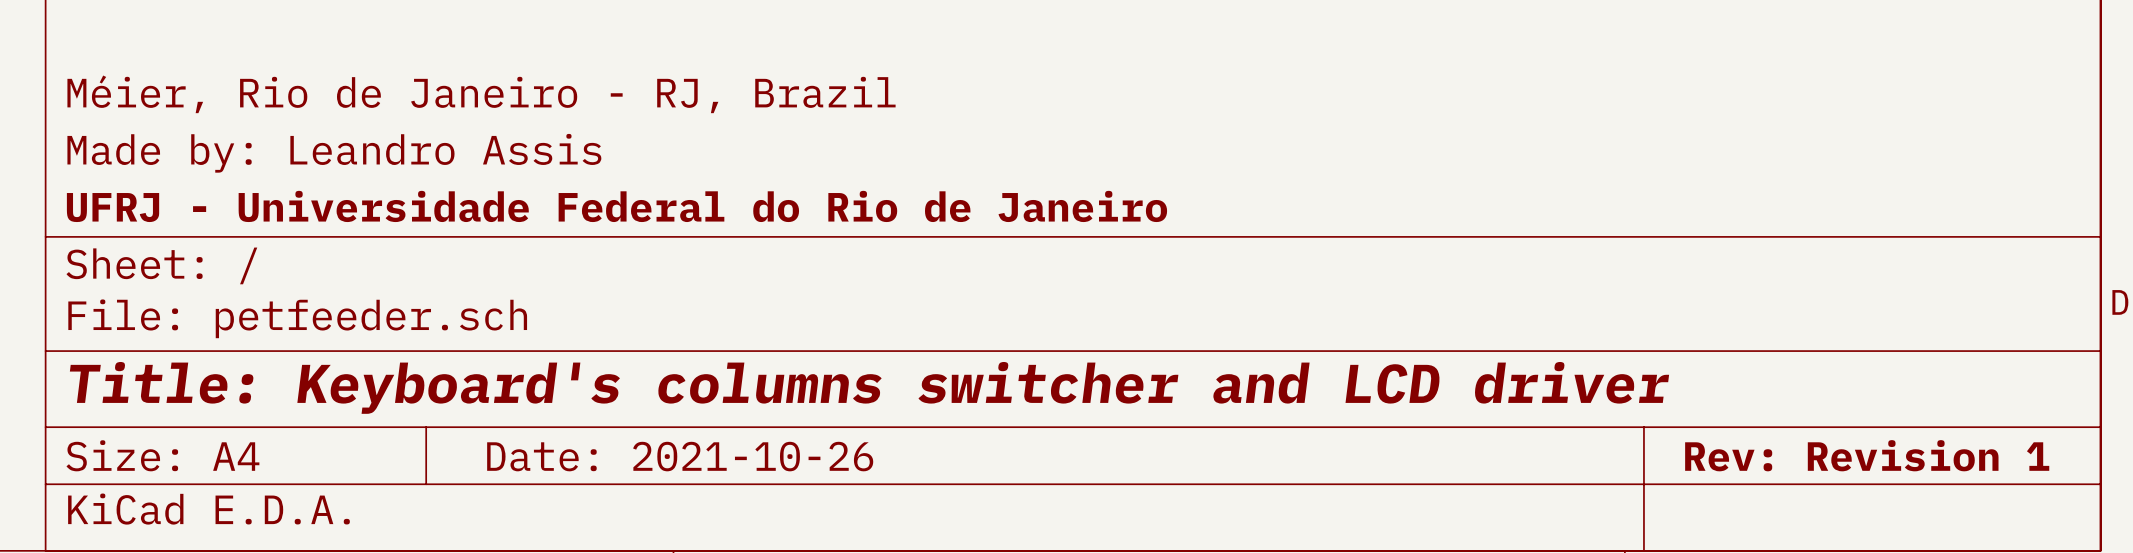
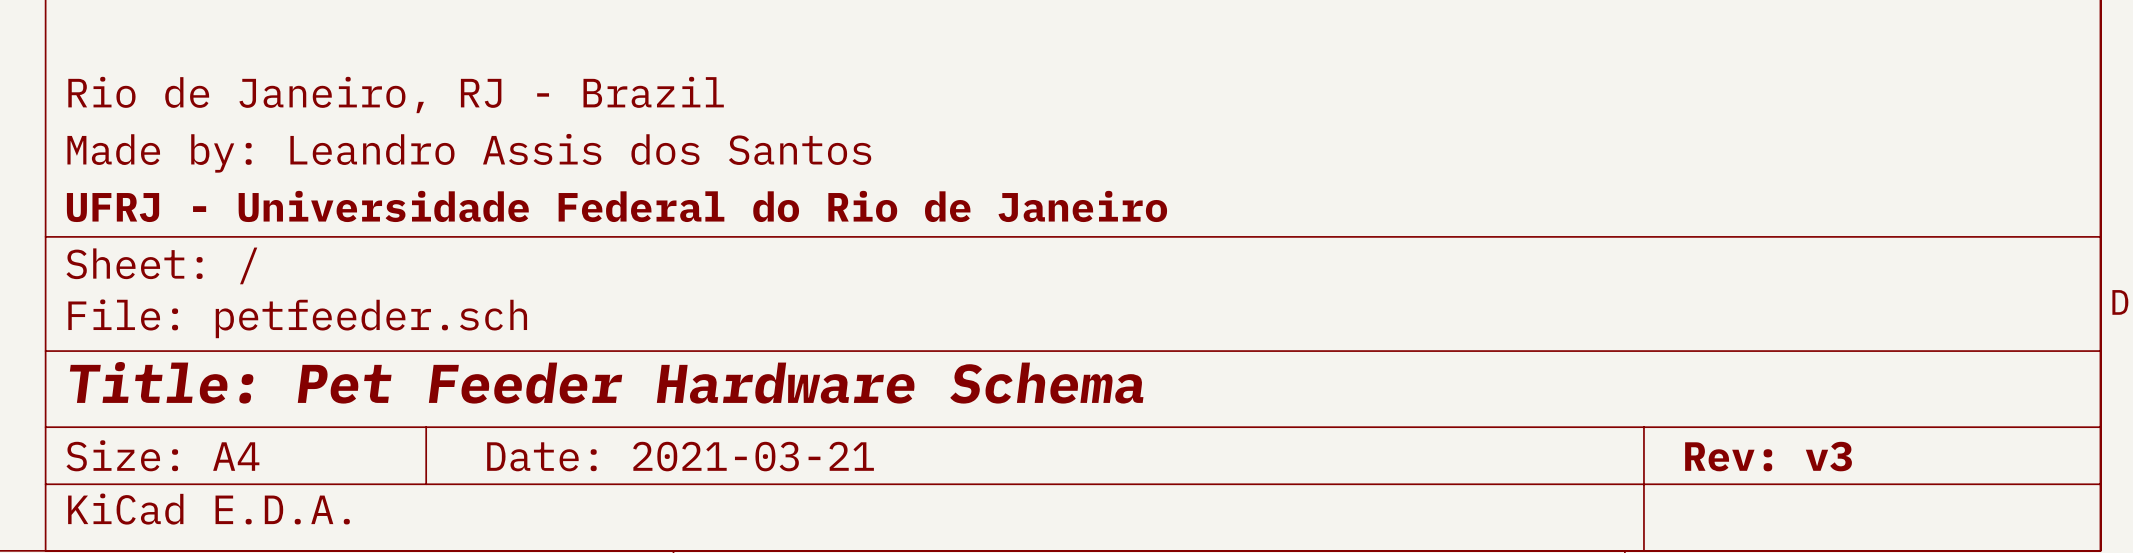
title block: Méier, Rio de Janeiro - RJ, Brazil (481, 94) -> Rio de Janeiro, RJ - Brazil (396, 94)
title block: Made by: Leandro Assis (334, 153) -> Made by: Leandro Assis dos Santos (469, 153)
title block: Title: Keyboard's columns switcher and LCD driver (869, 387) -> Title: Pet Feeder Hardware Schema (606, 382)
title block: Rev: Revision 1 (1867, 455) -> Rev: v3 (1768, 456)
title block: Date: 2021-10-26 (680, 456) -> Date: 2021-03-21 (680, 456)

